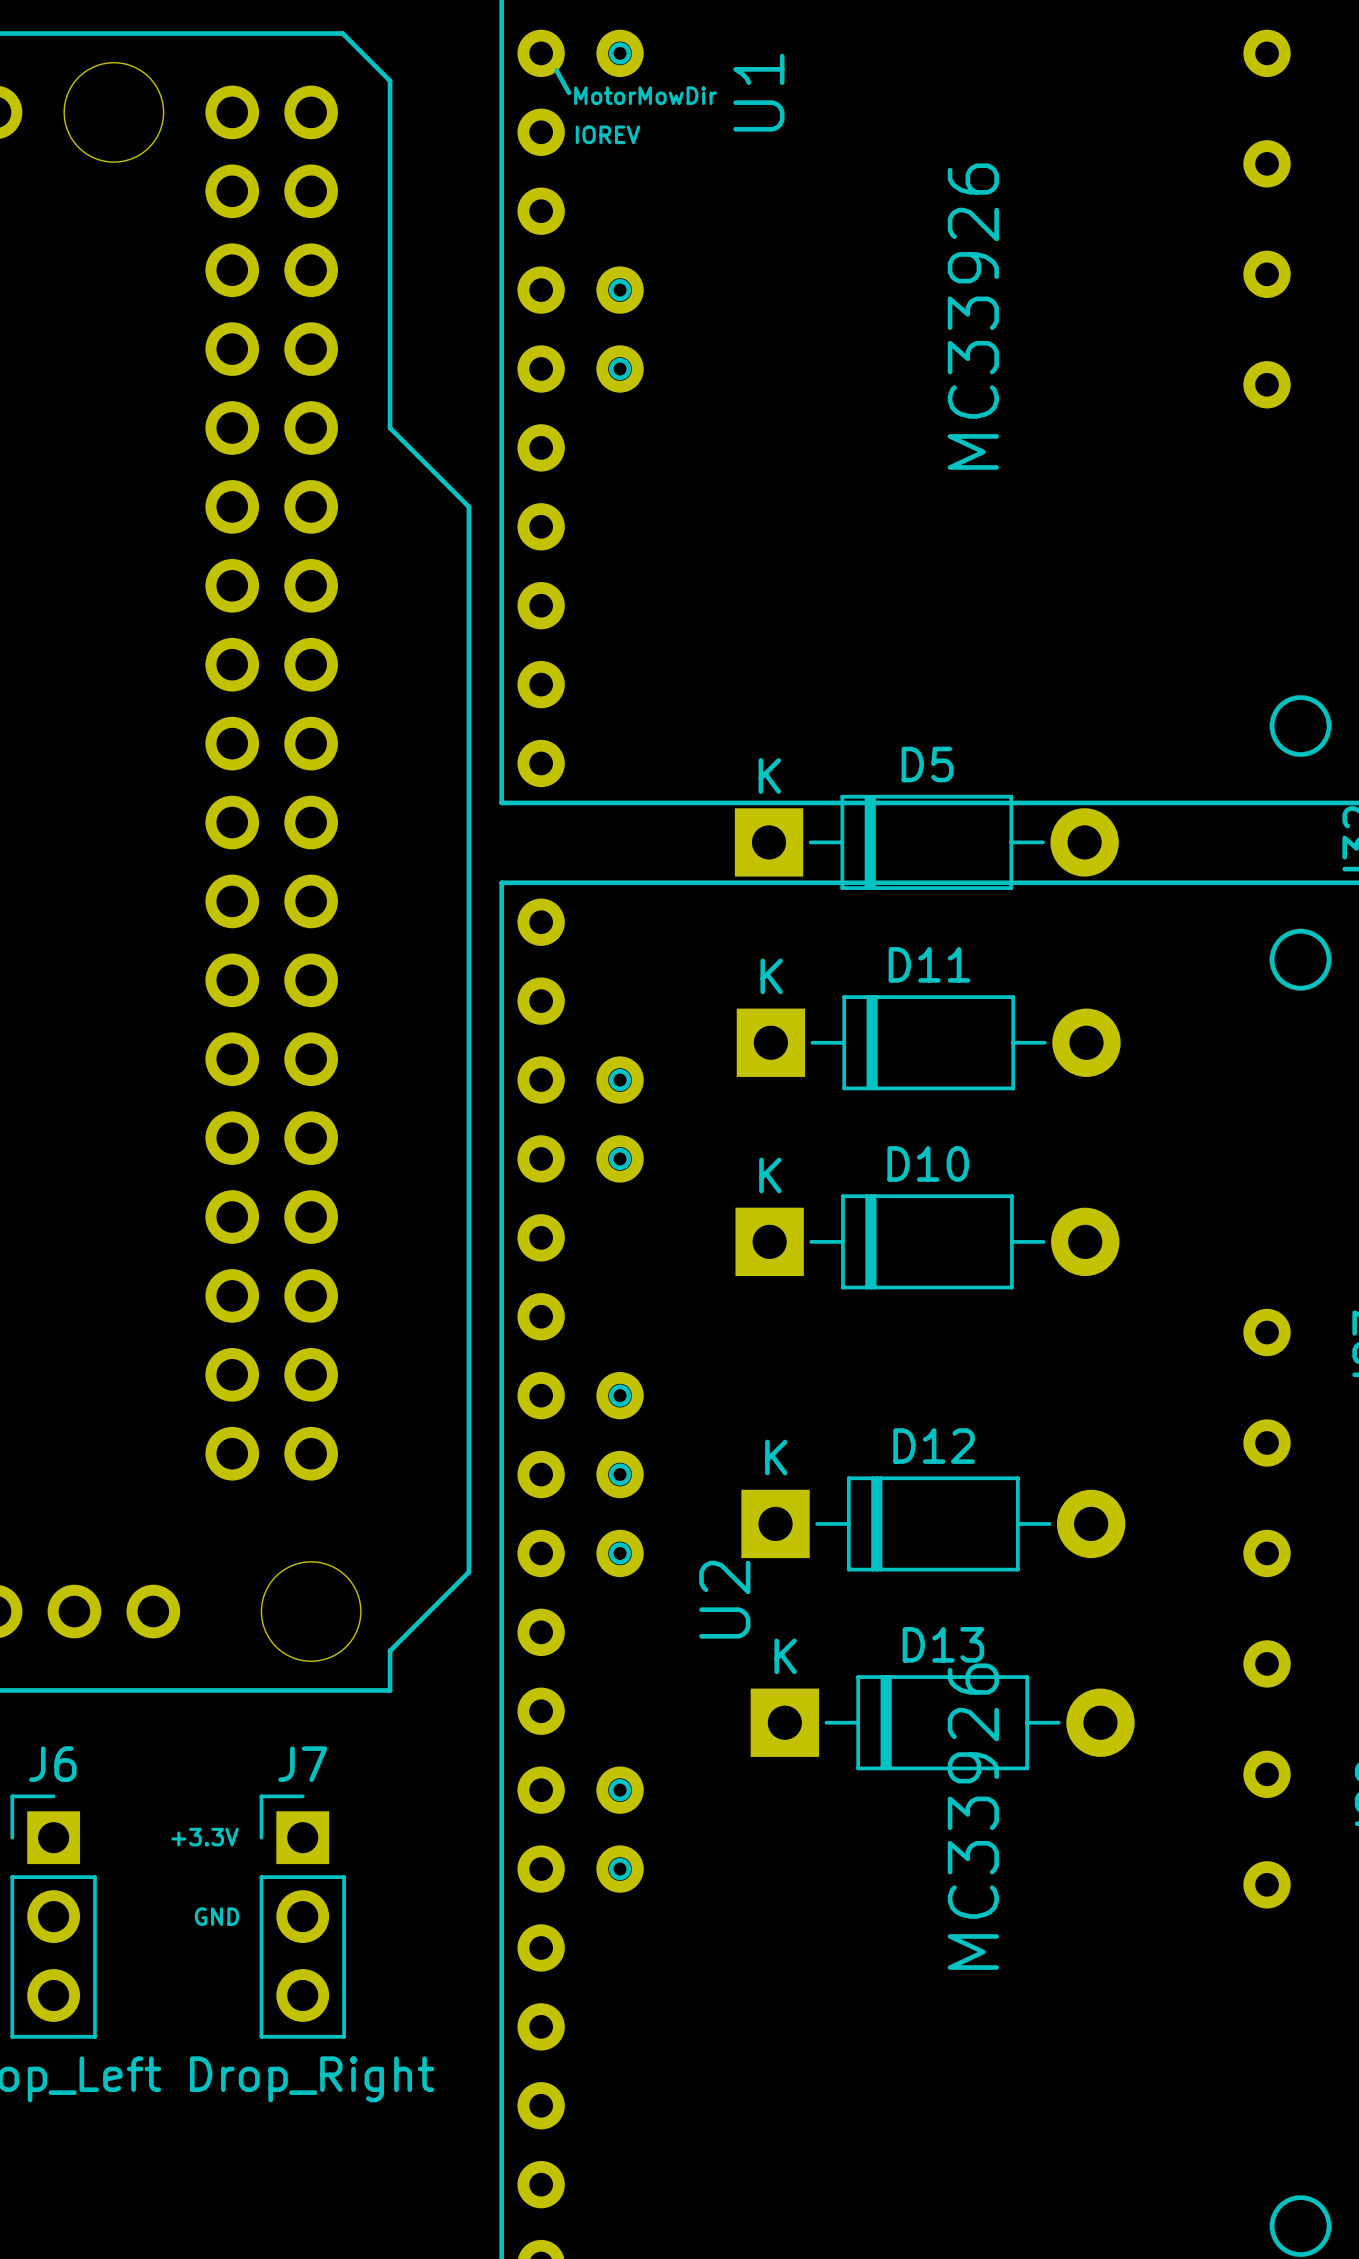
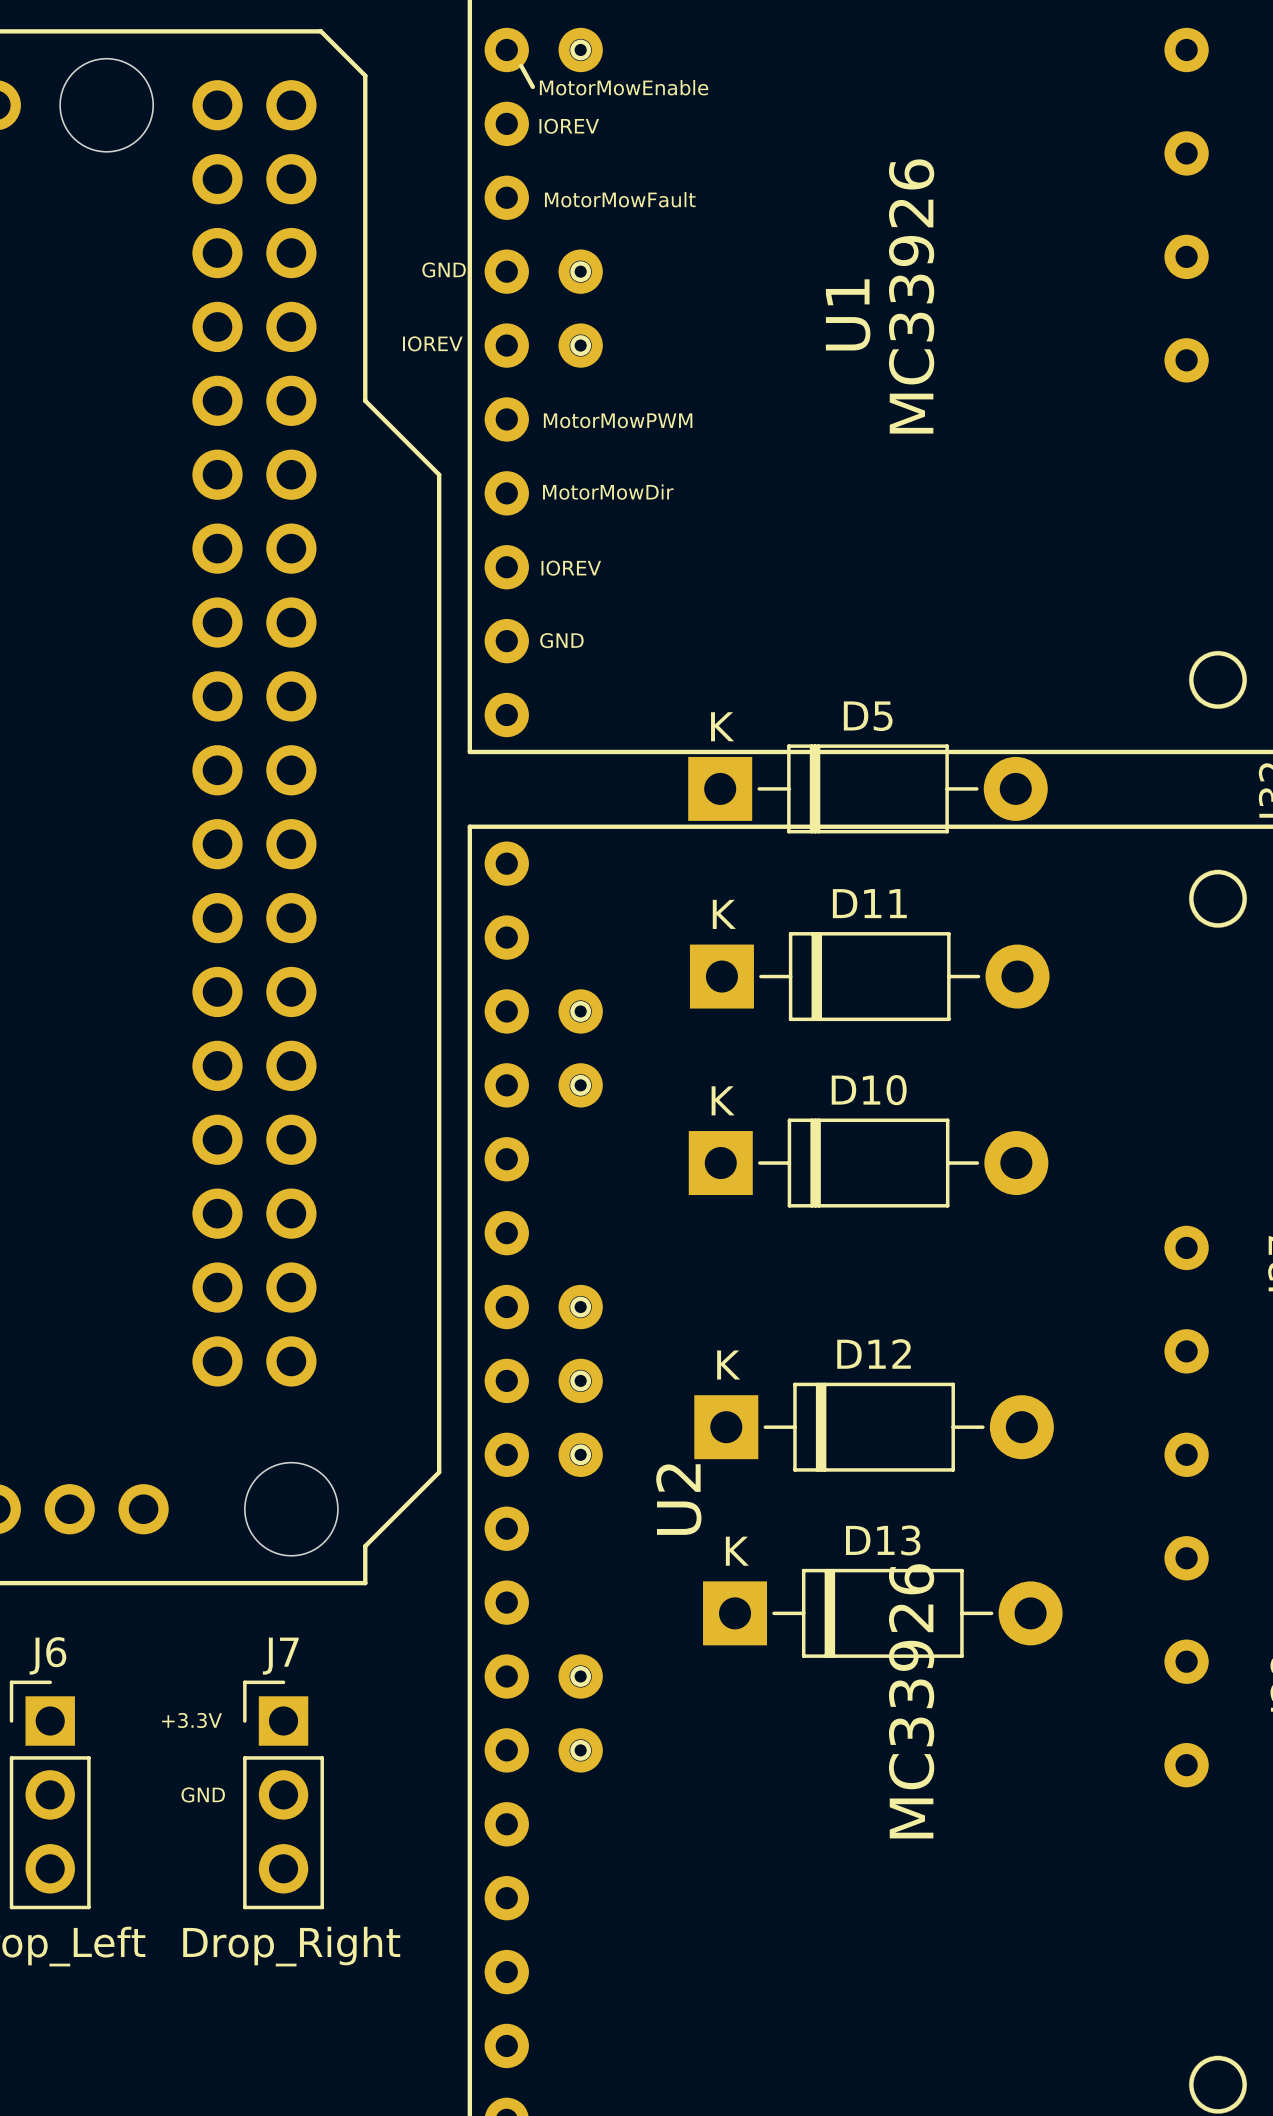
U1 name position: U1 (758, 92) -> U1 (848, 314)
text: MotorMowDir (645, 95) -> MotorMowEnable (624, 87)
text: none -> MotorMowFault (620, 199)
text: none -> GND (444, 269)
text: none -> IOREV (432, 343)
text: none -> MotorMowPWM (618, 420)
text: none -> MotorMowDir (608, 492)
text: none -> IOREV (571, 568)
text: none -> GND (561, 640)

